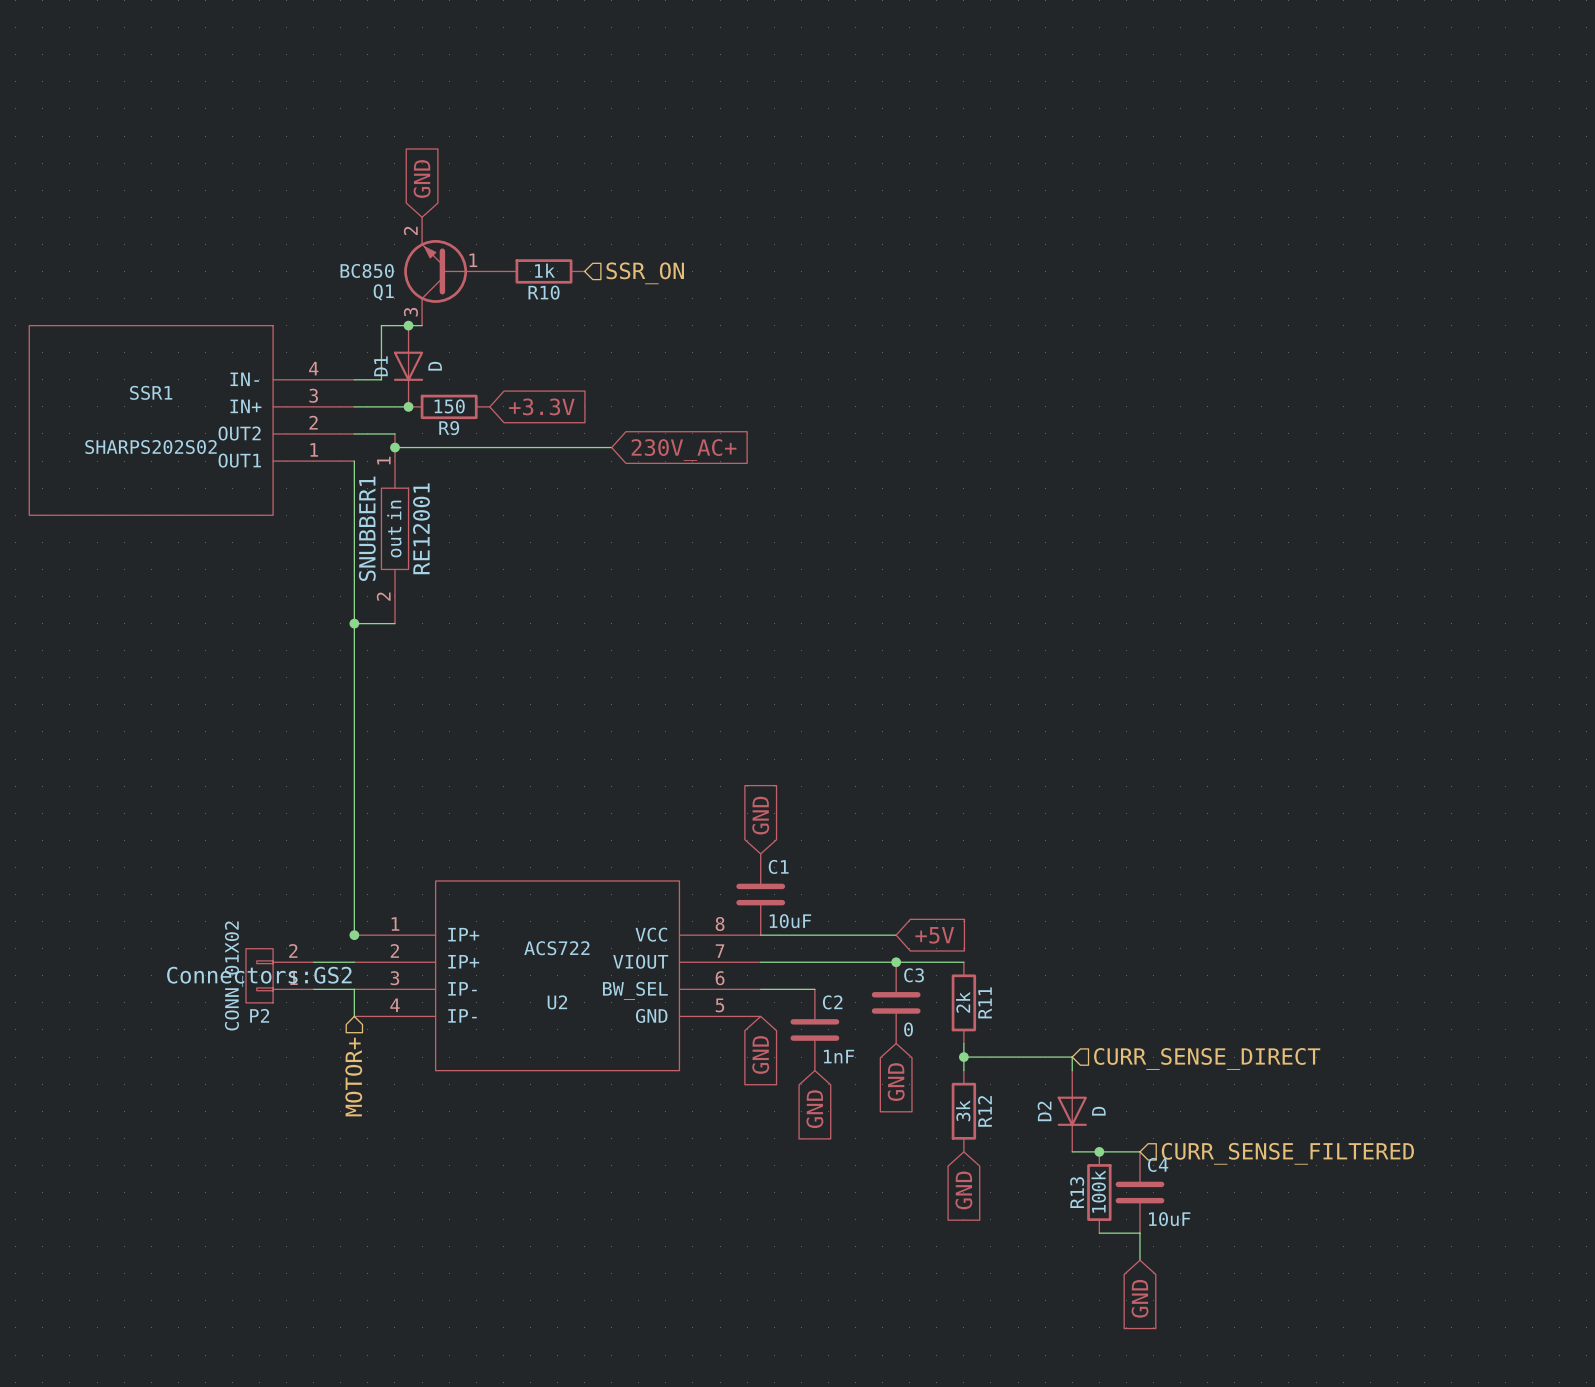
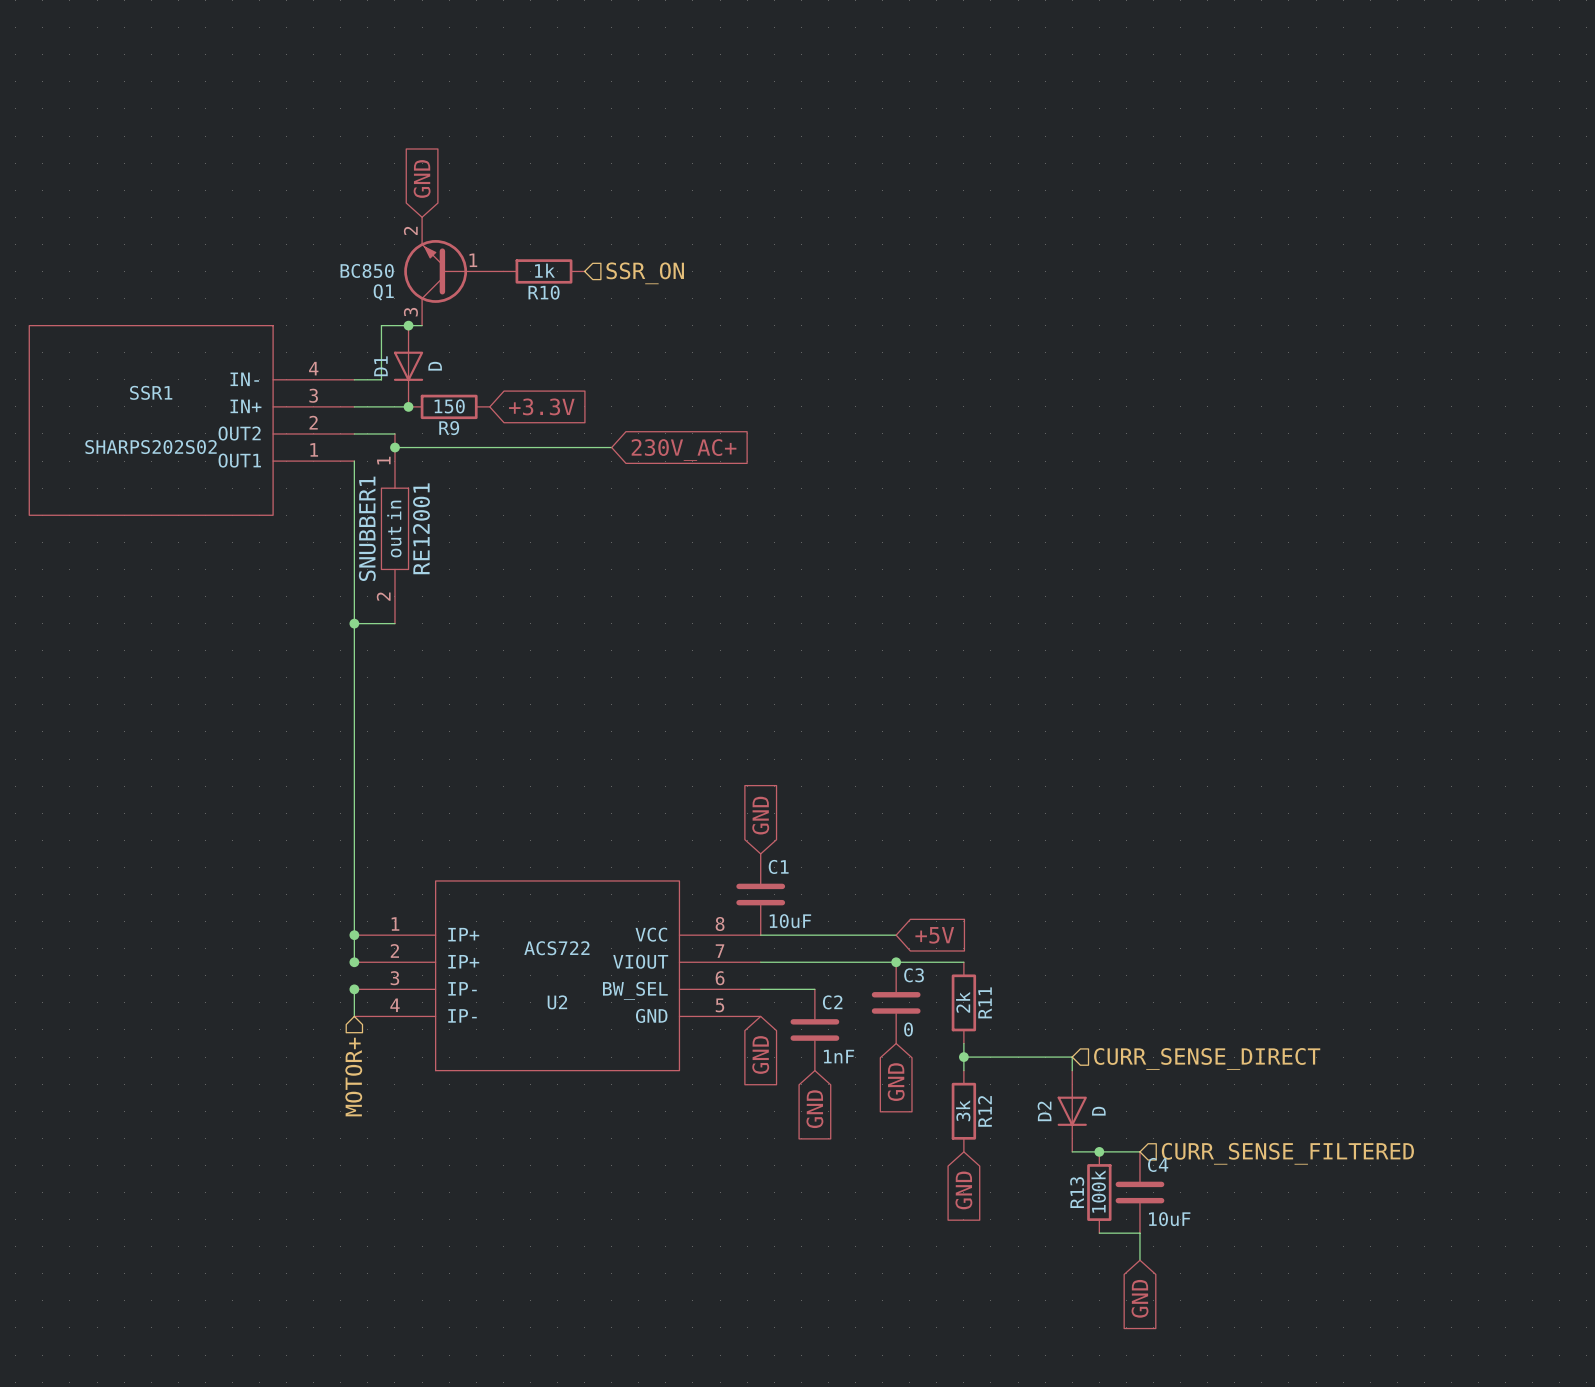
wire: (313, 962) (354, 962) -> (354, 935) (354, 962)
junction: none -> (354, 962)
P2: CONN_01X02 (279, 975) -> none
wire: (313, 989) (354, 989) -> none
junction: none -> (354, 989)

